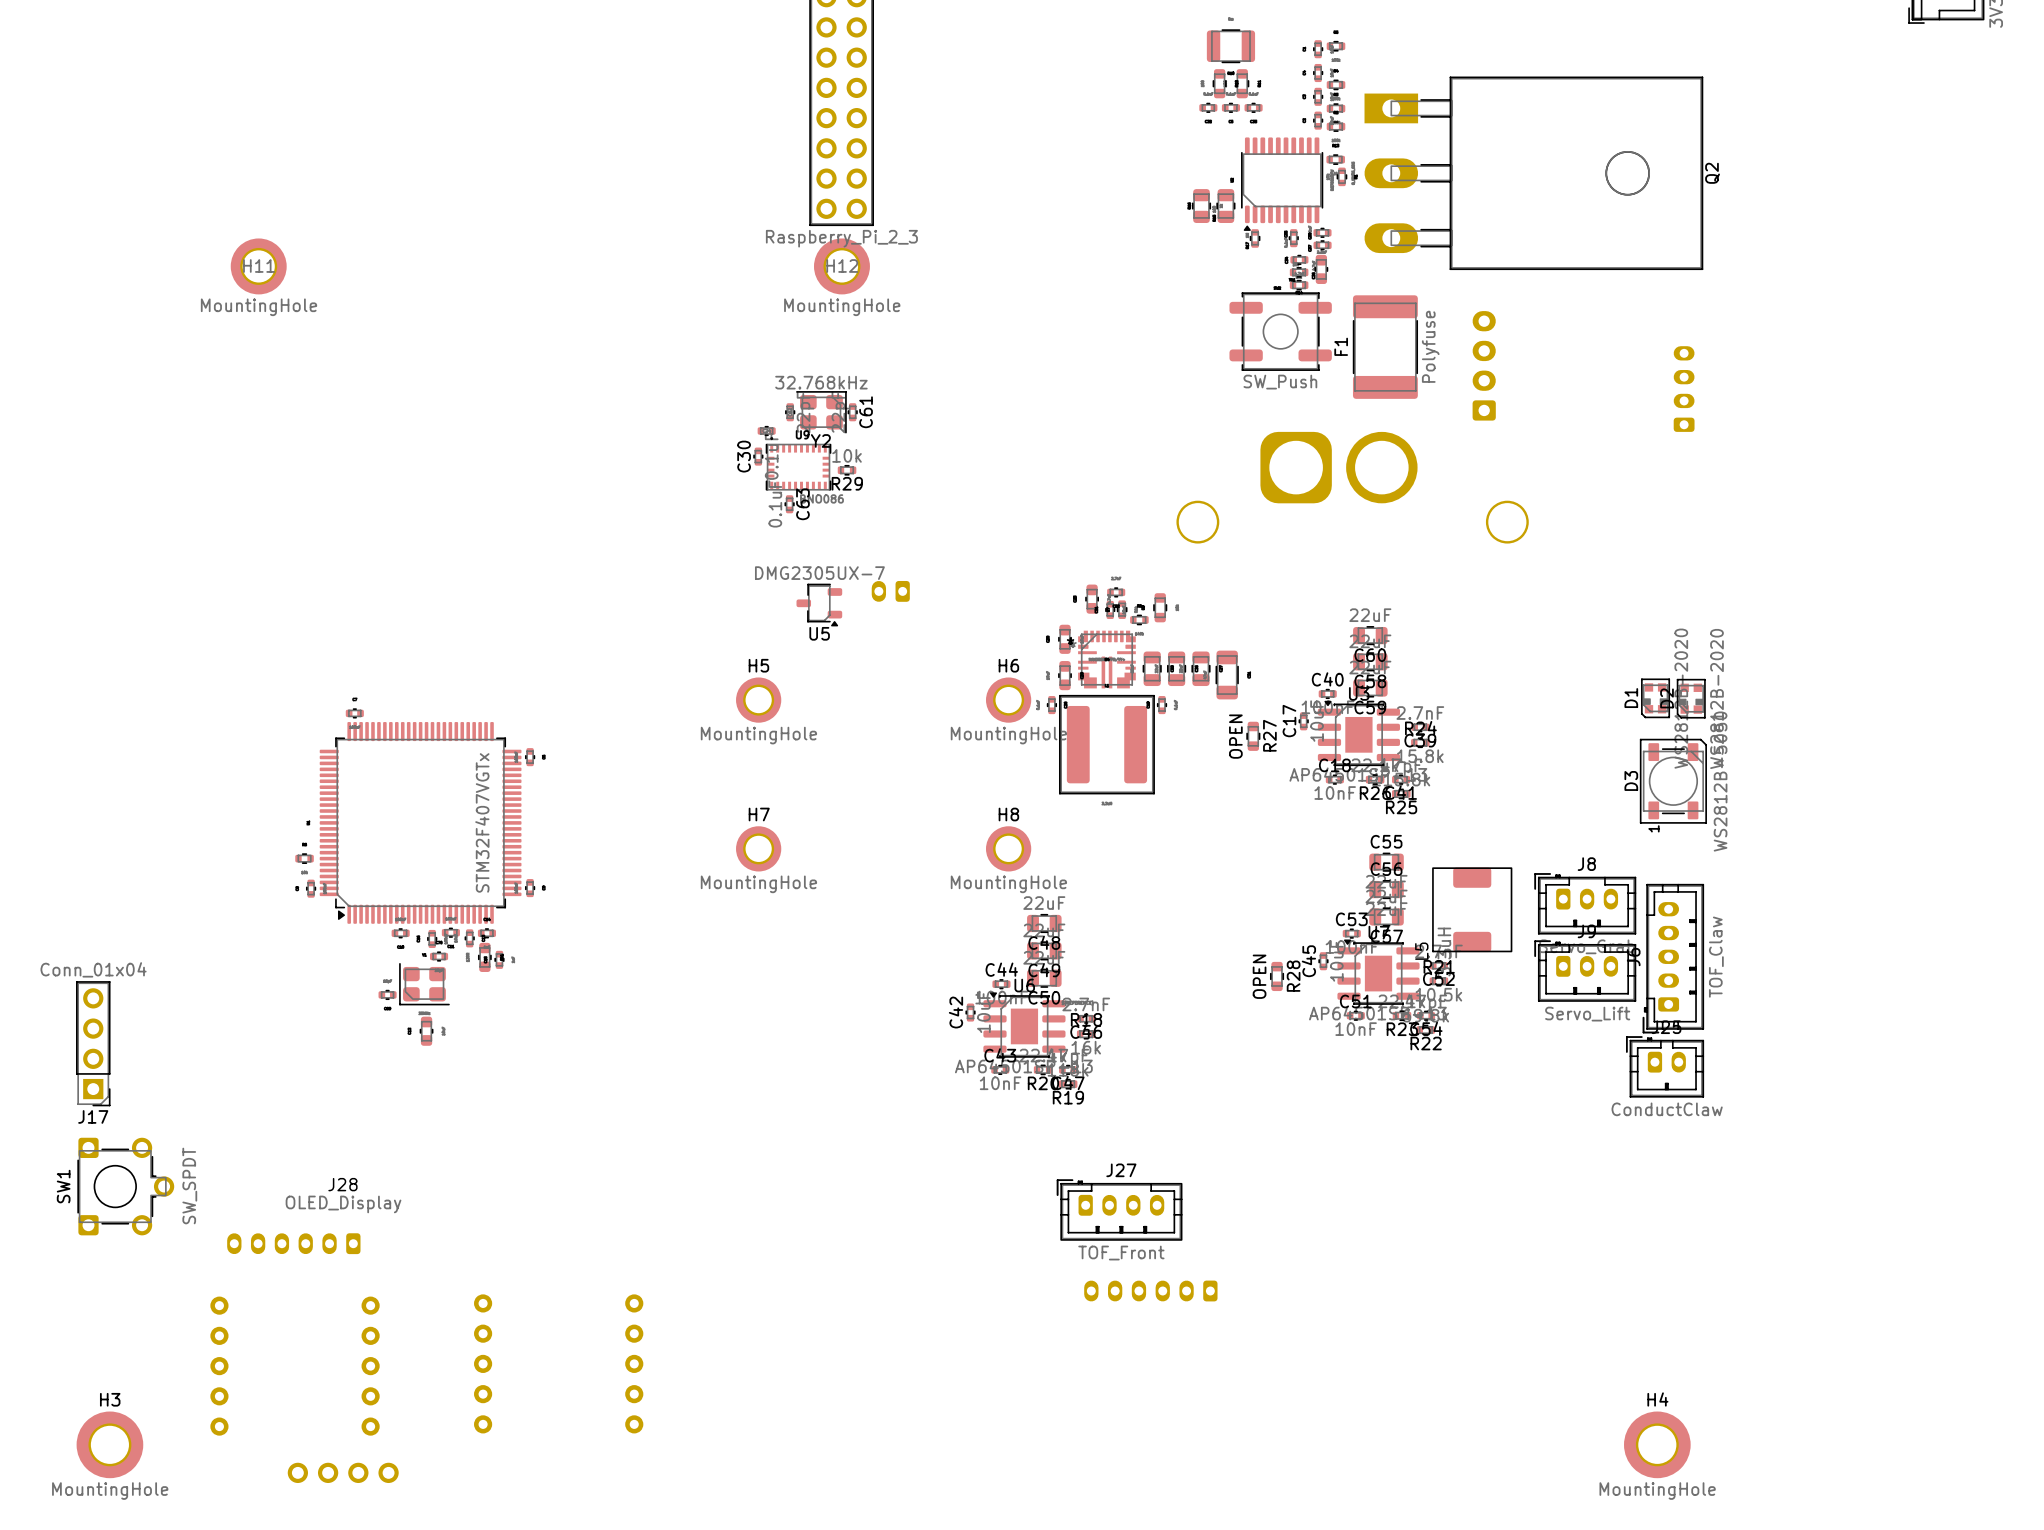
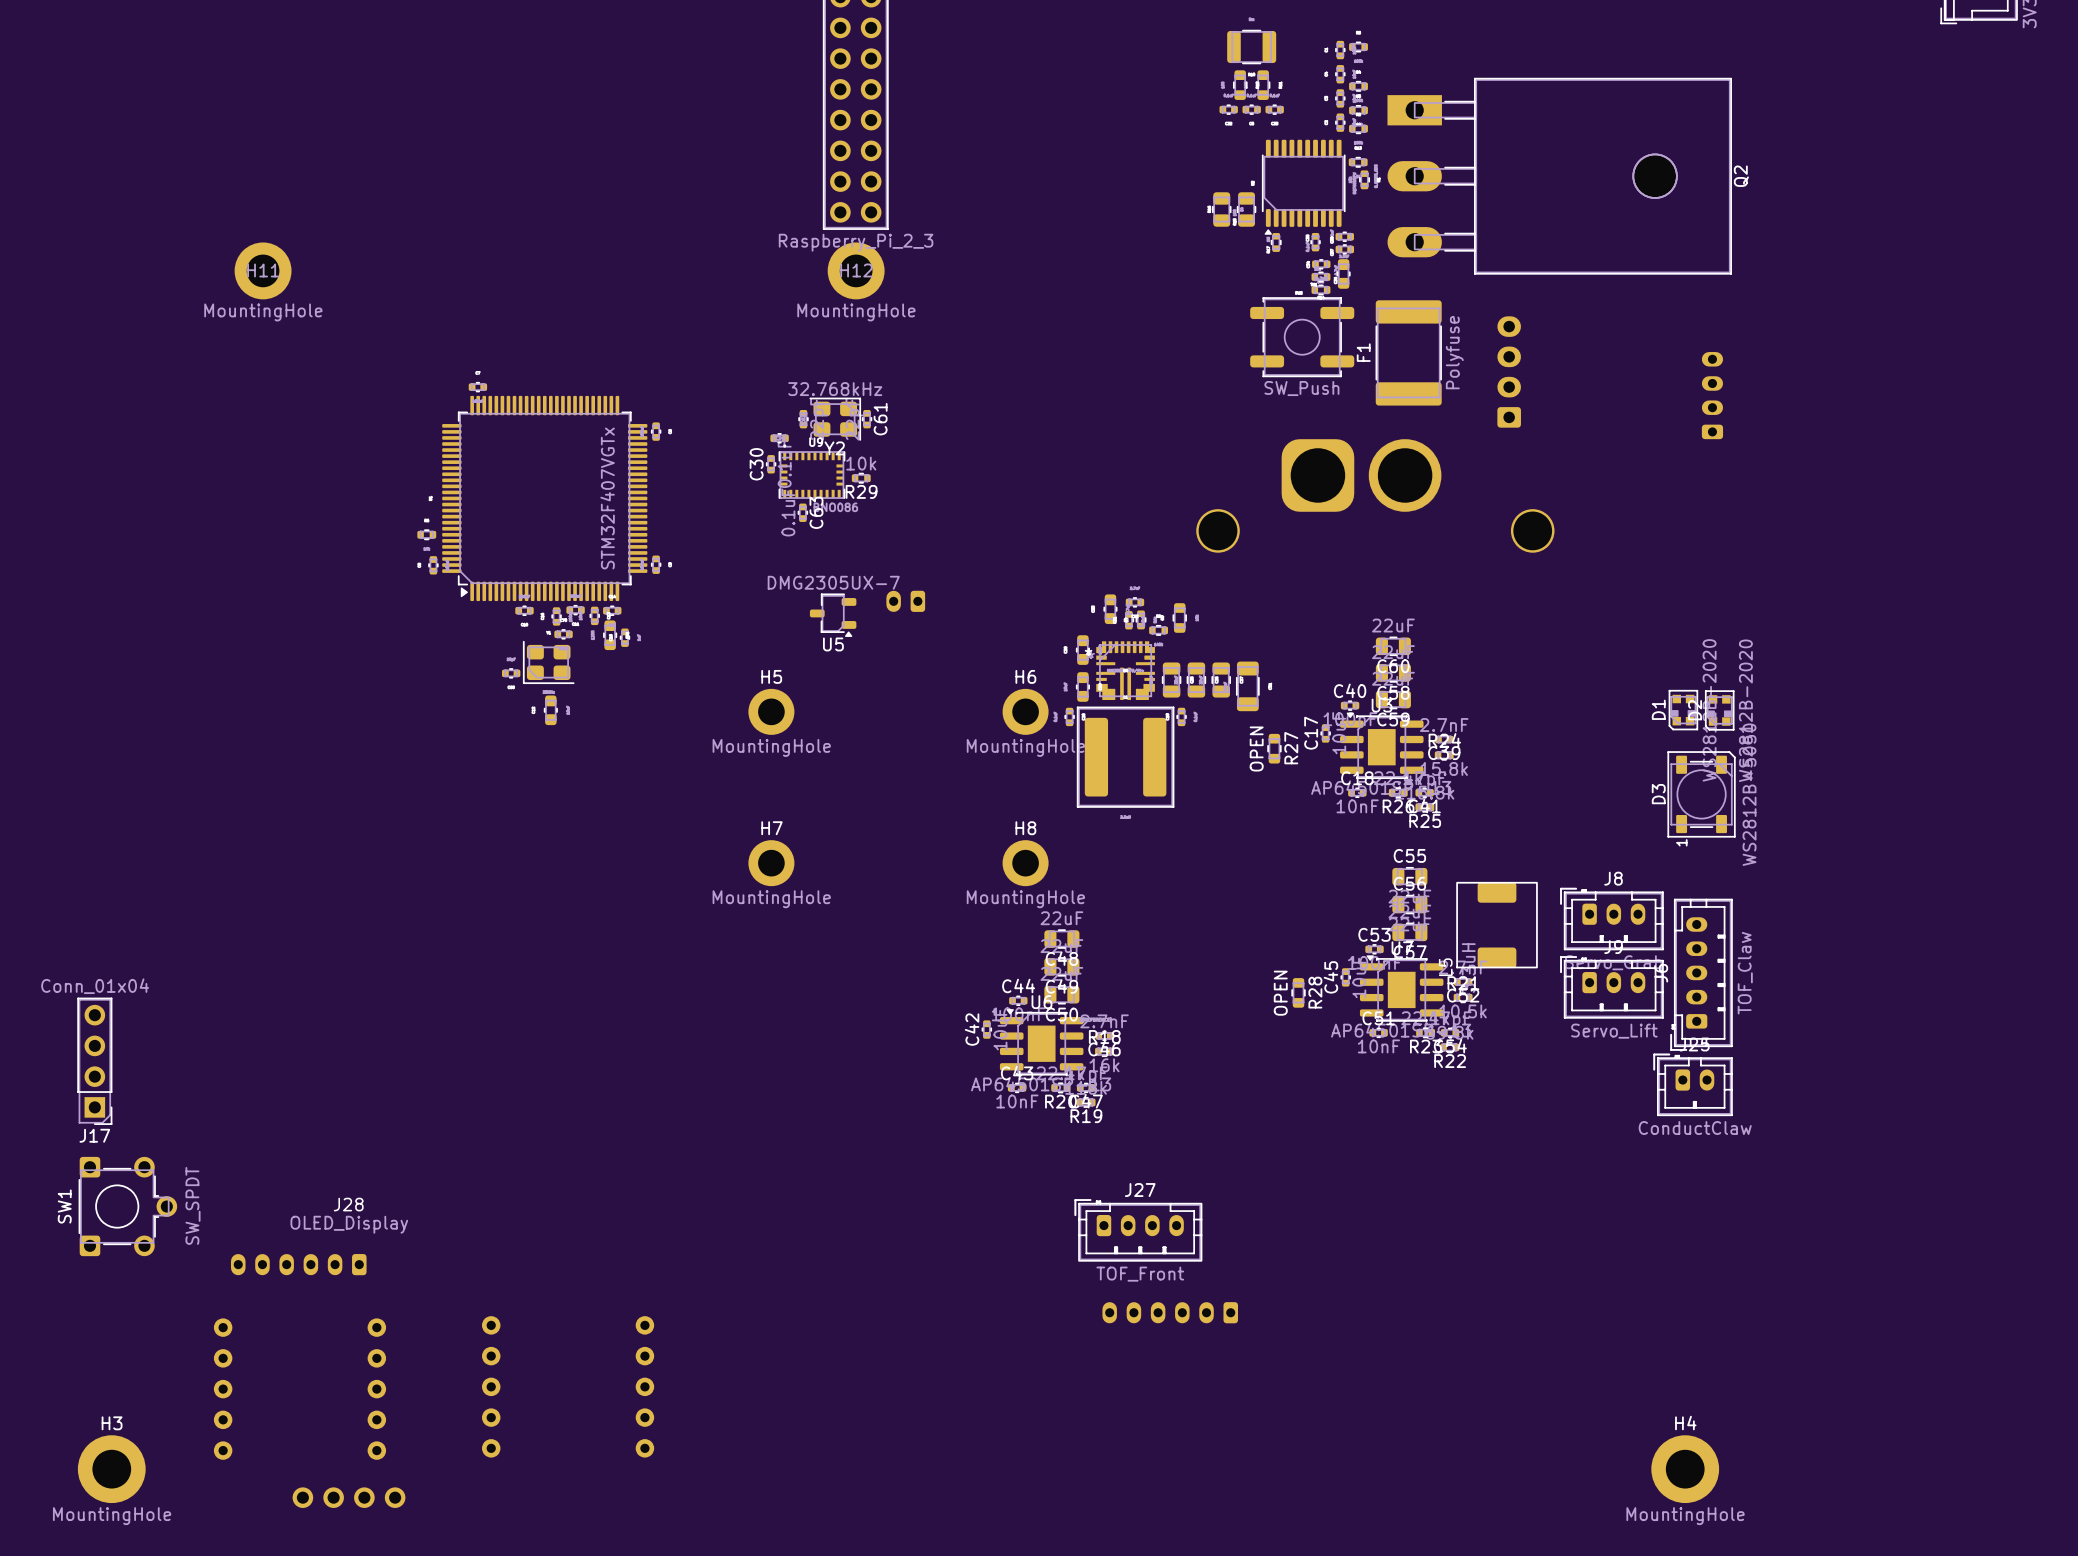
part position: (354, 713) -> (477, 387)
part position: (530, 757) -> (656, 431)
part position: (420, 822) -> (544, 498)
part position: (304, 858) -> (426, 534)
part position: (311, 888) -> (433, 565)
part position: (530, 888) -> (656, 564)
part position: (450, 932) -> (575, 610)
part position: (400, 933) -> (524, 610)
part position: (486, 933) -> (612, 610)
part position: (432, 938) -> (556, 616)
part position: (469, 938) -> (594, 615)
part position: (439, 956) -> (563, 634)
part position: (484, 957) -> (610, 635)
part position: (499, 959) -> (624, 637)
part position: (424, 984) -> (548, 662)
part position: (387, 994) -> (511, 673)
part position: (426, 1031) -> (550, 710)

